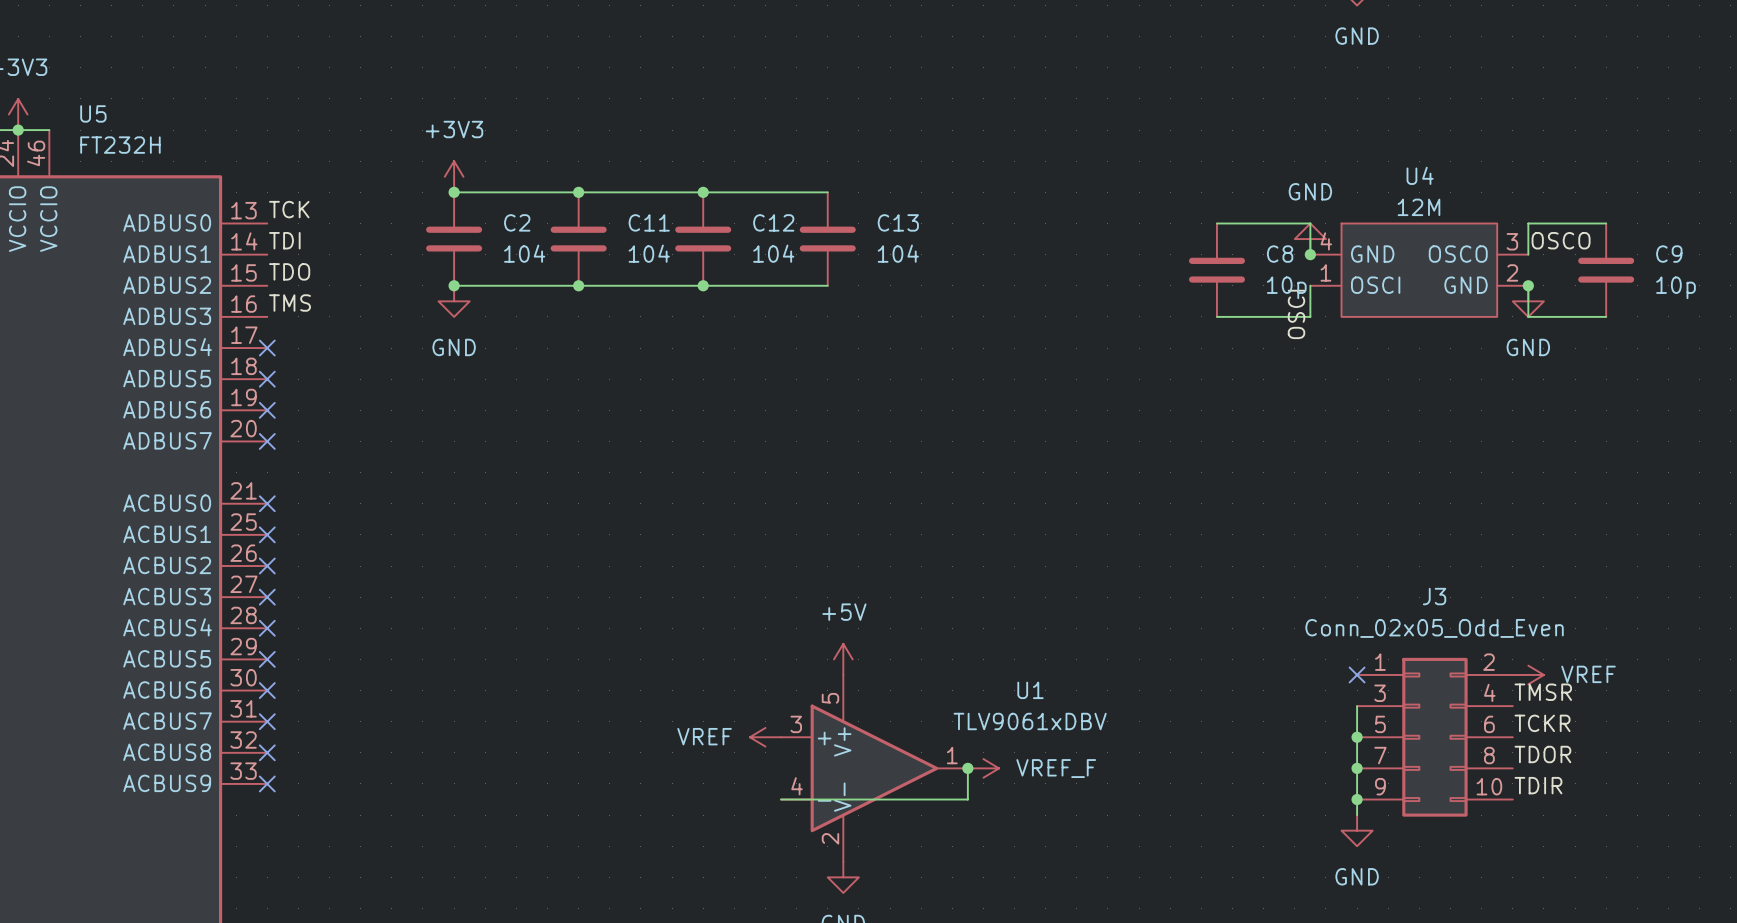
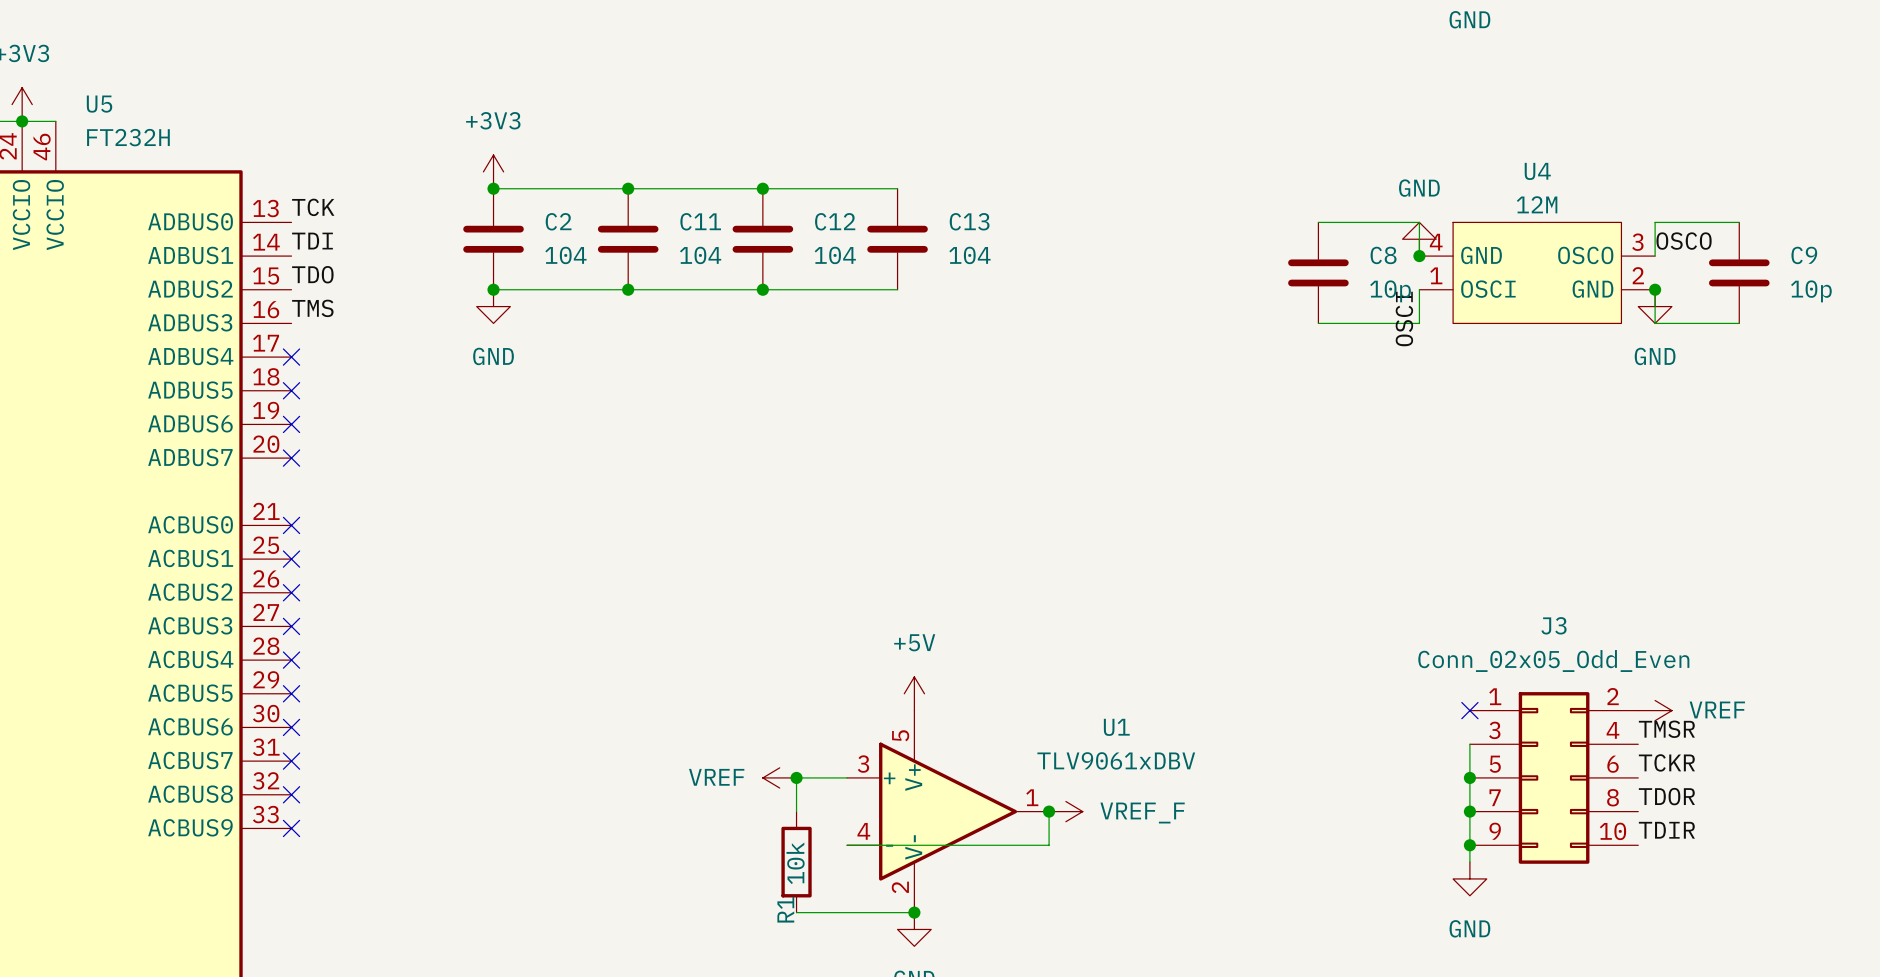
junction: none -> (796, 777)
power symbol position: VREF (765, 737) -> VREF (779, 777)
wire: none -> (847, 777) (796, 777) (796, 811)
R1: none -> 10k (796, 862)
wire: none -> (796, 912) (914, 912)
junction: none -> (914, 912)

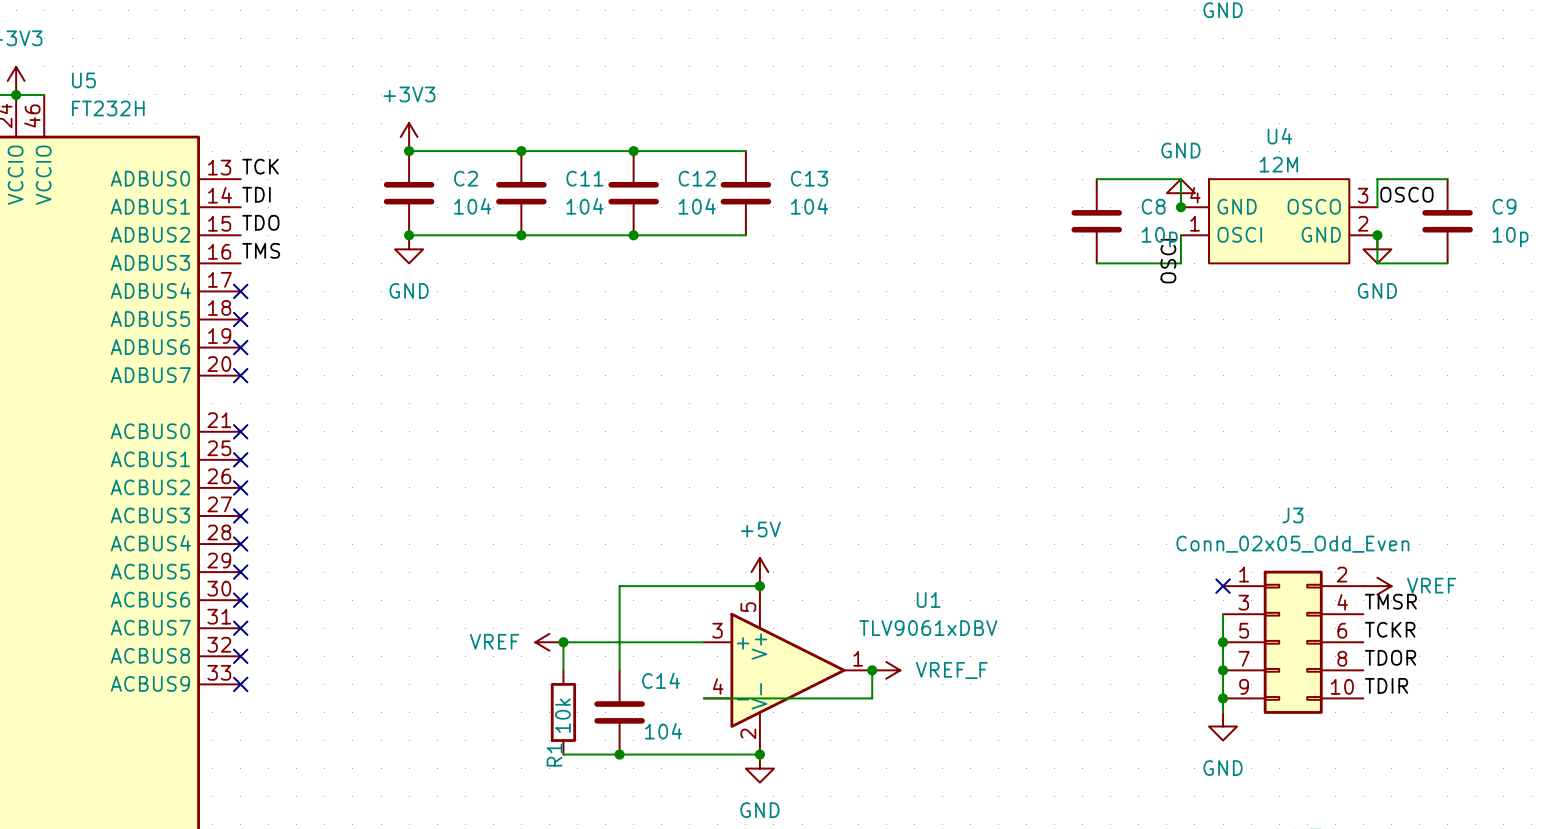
wire: none -> (759, 586) (619, 586) (619, 670)
junction: none -> (759, 586)
junction: none -> (563, 642)
power symbol position: VREF (779, 777) -> VREF (549, 642)
wire: (796, 777) (796, 811) -> (661, 642) (563, 642) (563, 670)
junction: (796, 777) -> none
C14: none -> 104 (619, 712)
R1 position: (796, 862) -> (563, 712)
wire: none -> (563, 754) (661, 754)
junction: none -> (619, 754)

